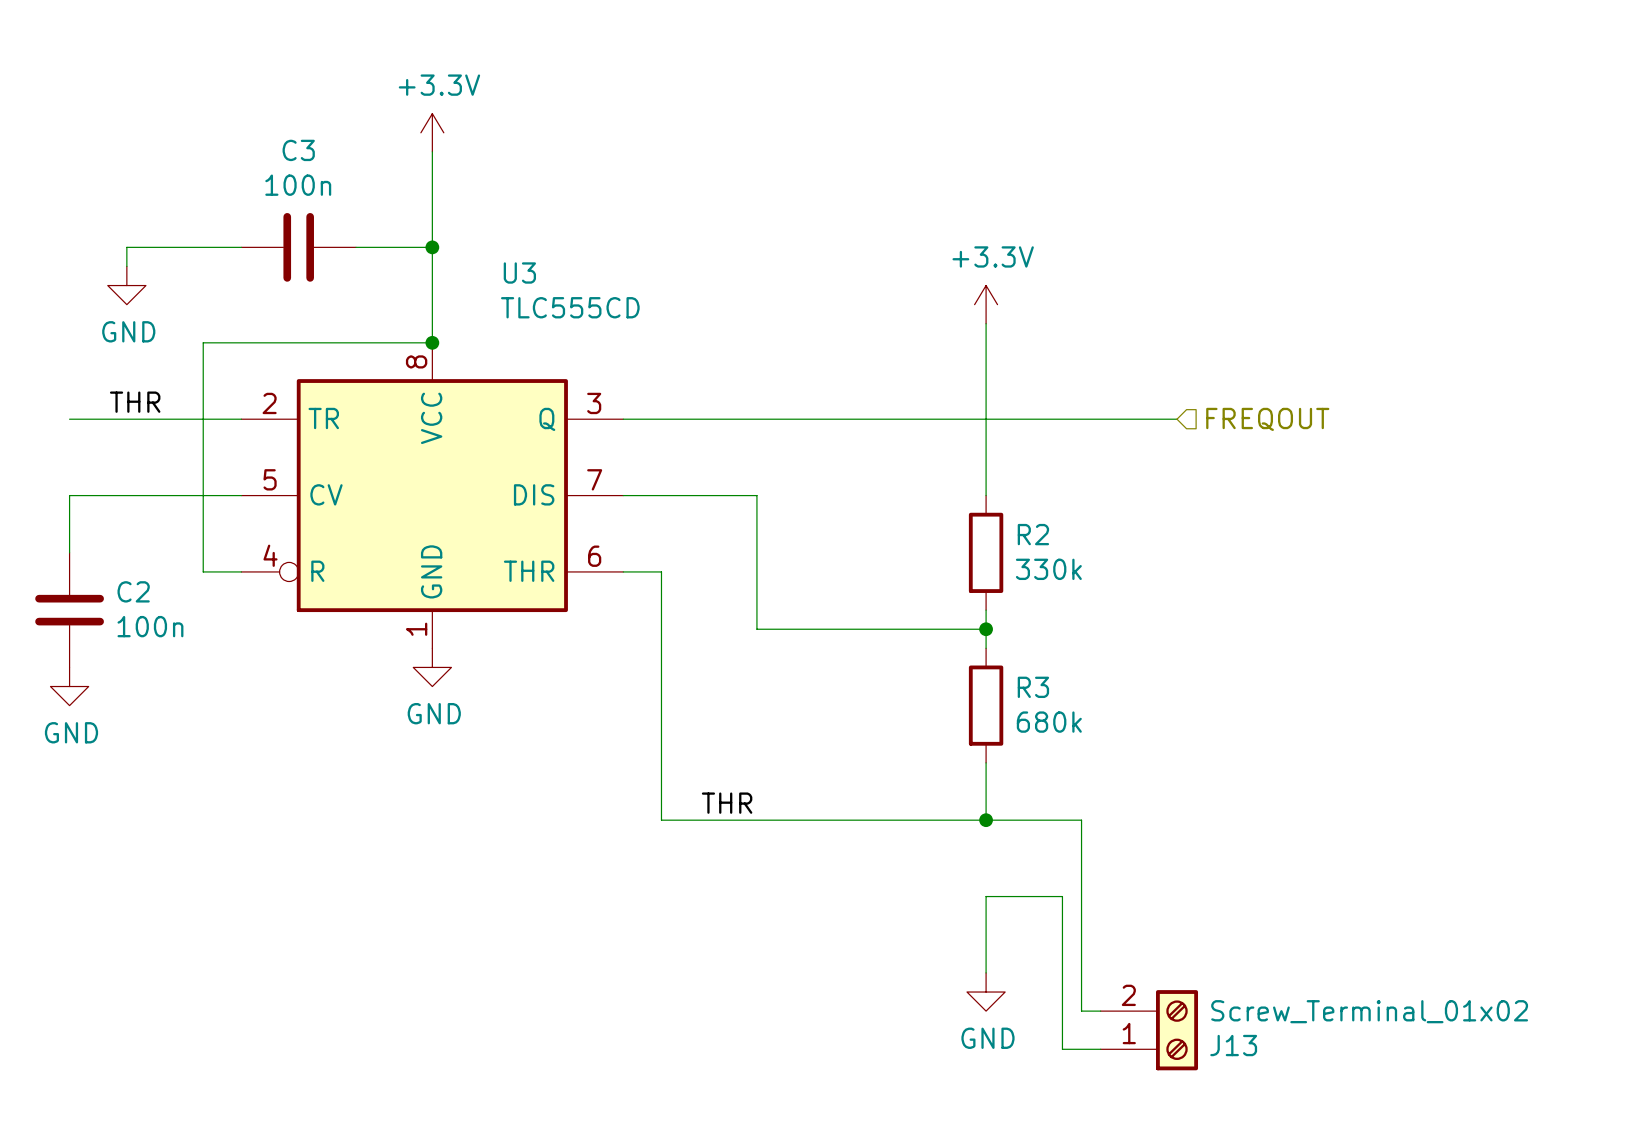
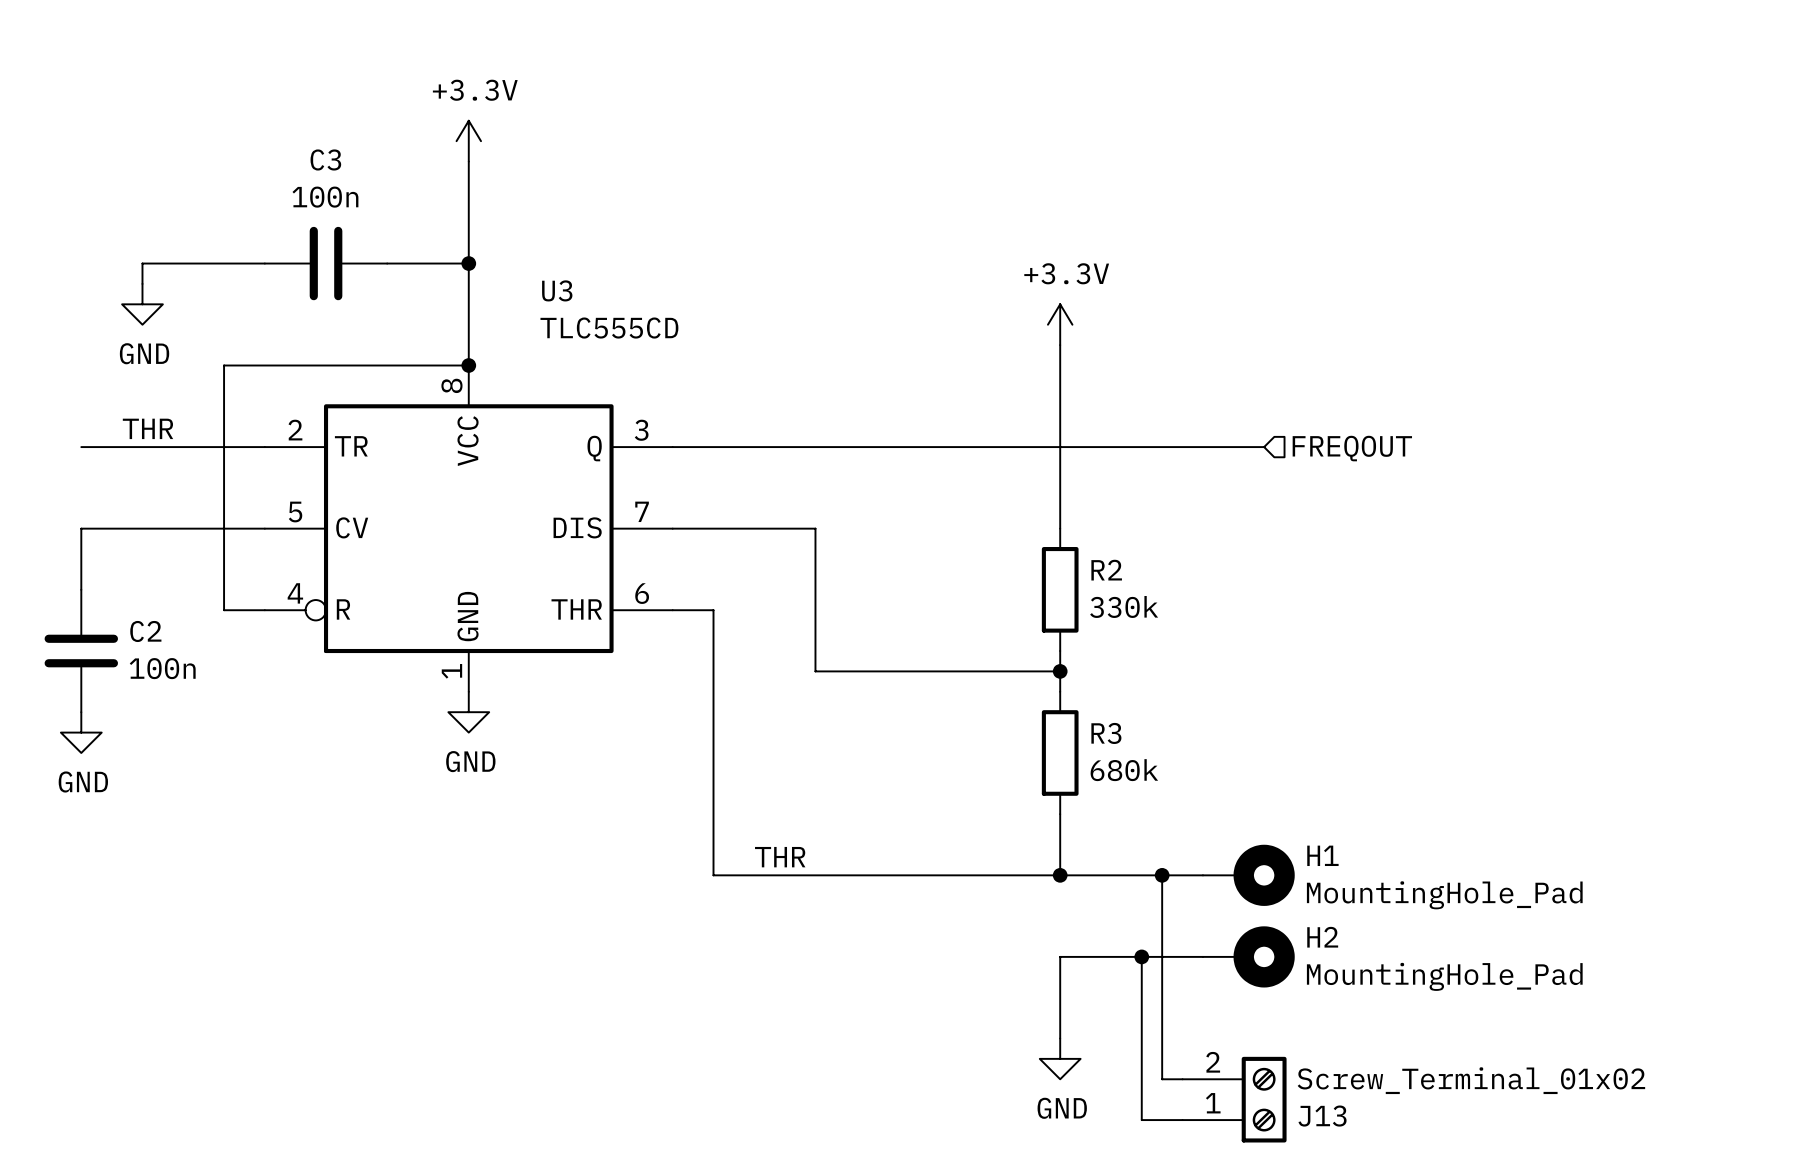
wire: none -> (1162, 875) (1202, 875)
junction: none -> (1162, 875)
H1: none -> MountingHole_Pad (1248, 875)
wire: none -> (1141, 956) (1202, 956)
junction: none -> (1141, 956)
H2: none -> MountingHole_Pad (1248, 956)

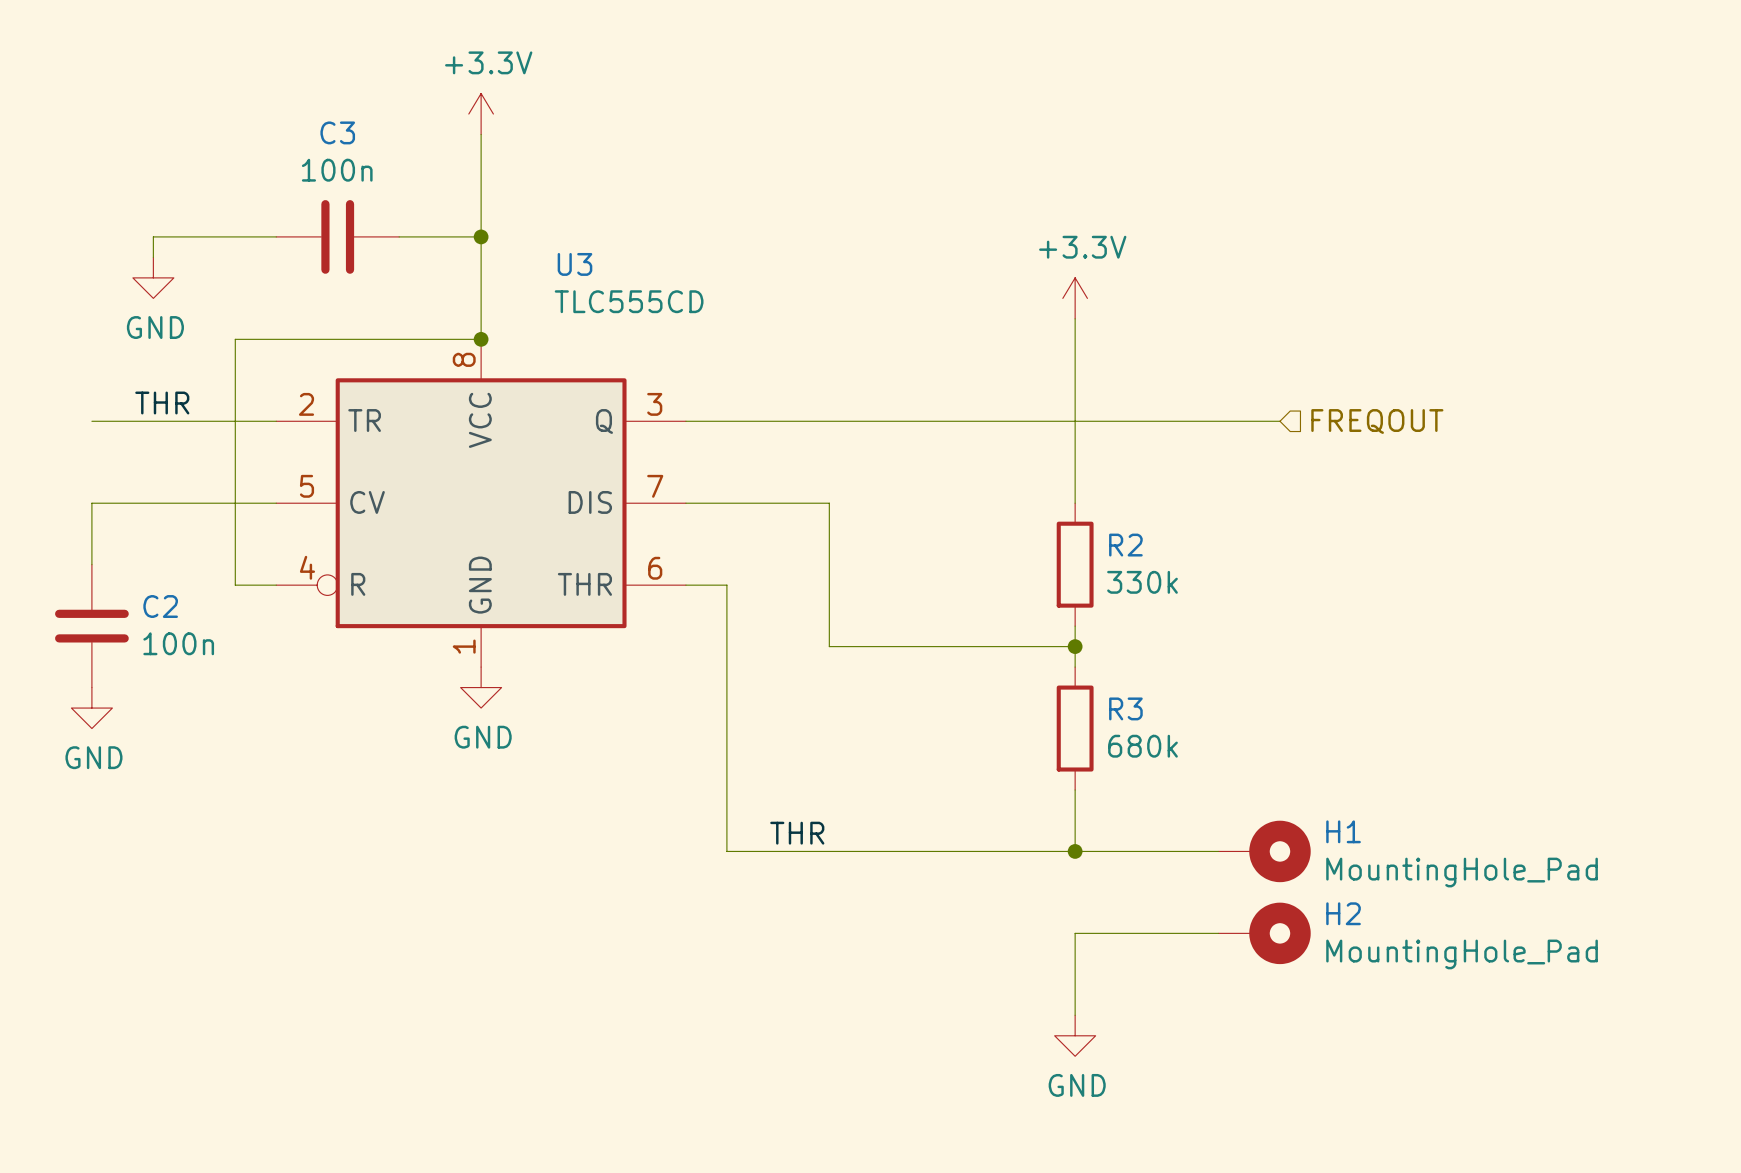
wire: (1162, 875) (1162, 1079) (1182, 1079) -> none
junction: (1162, 875) -> none
wire: (1141, 956) (1141, 1120) (1182, 1120) -> none
junction: (1141, 956) -> none
J13: Screw_Terminal_01x02 (1234, 1099) -> none

